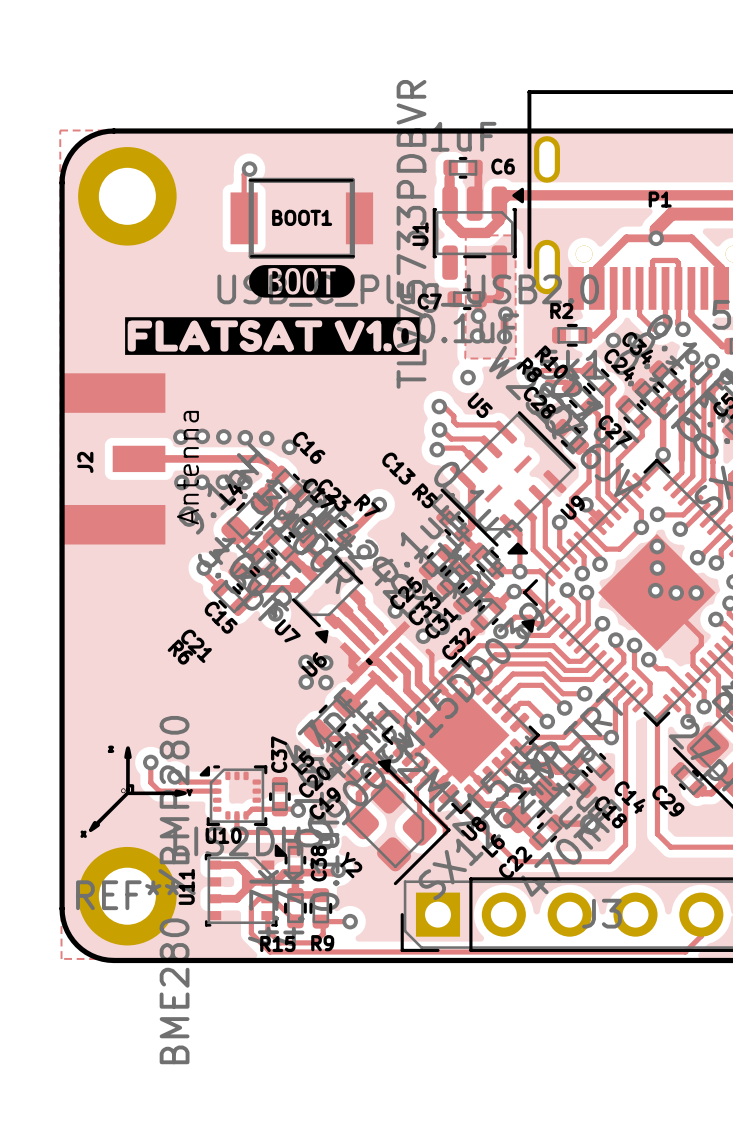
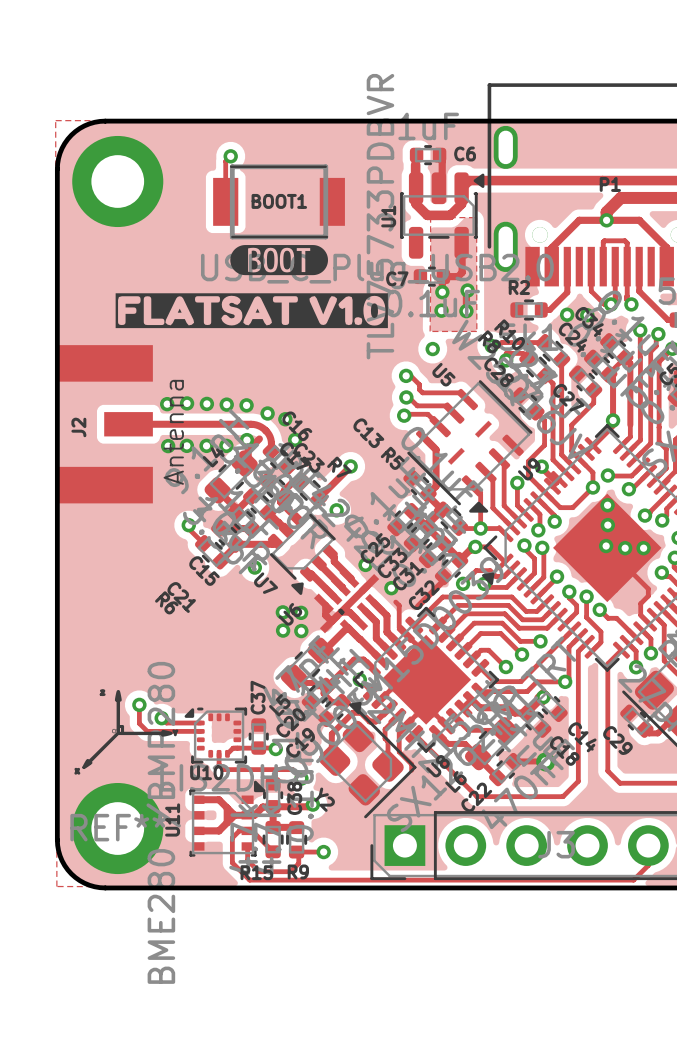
via: none -> (285, 419)
track: (253, 458) (266, 462) (280, 474) -> (234, 424) (253, 424) (263, 428) (270, 436) (271, 451)
via: none -> (295, 439)
via: none -> (246, 440)
C16 position: (289, 483) -> (279, 459)

